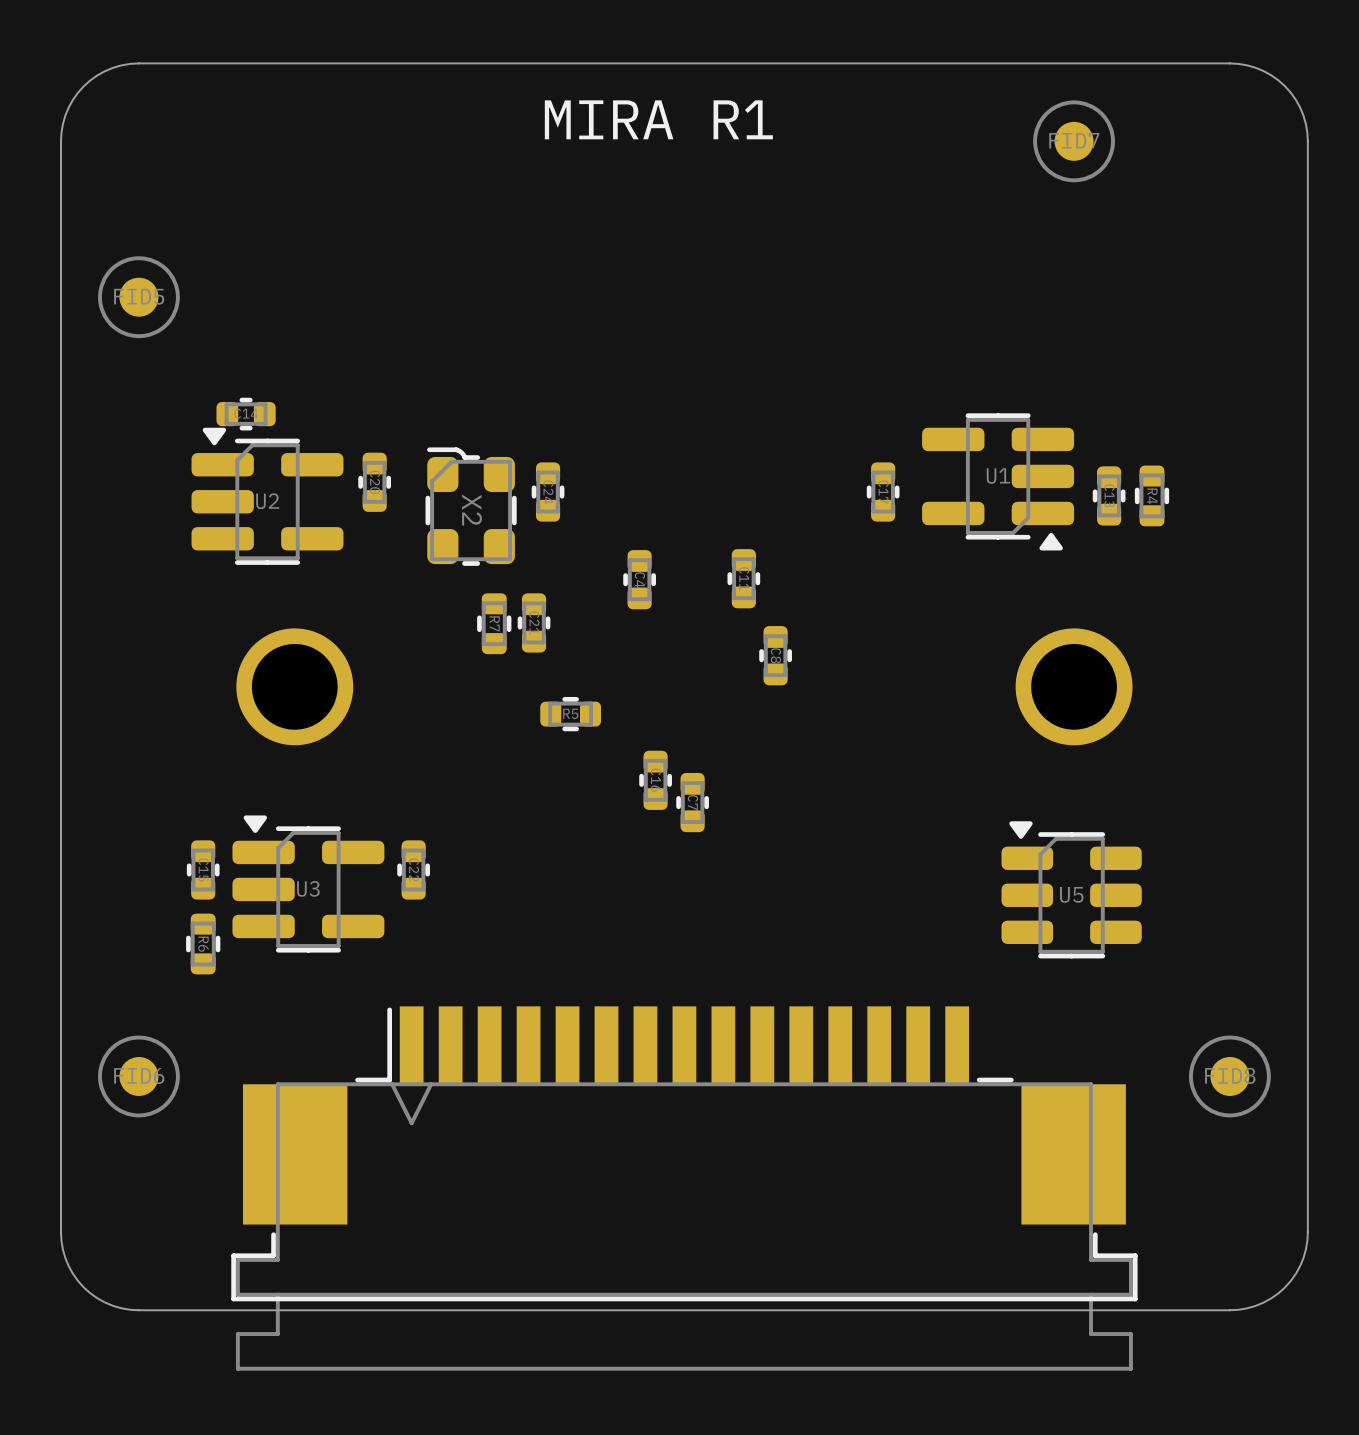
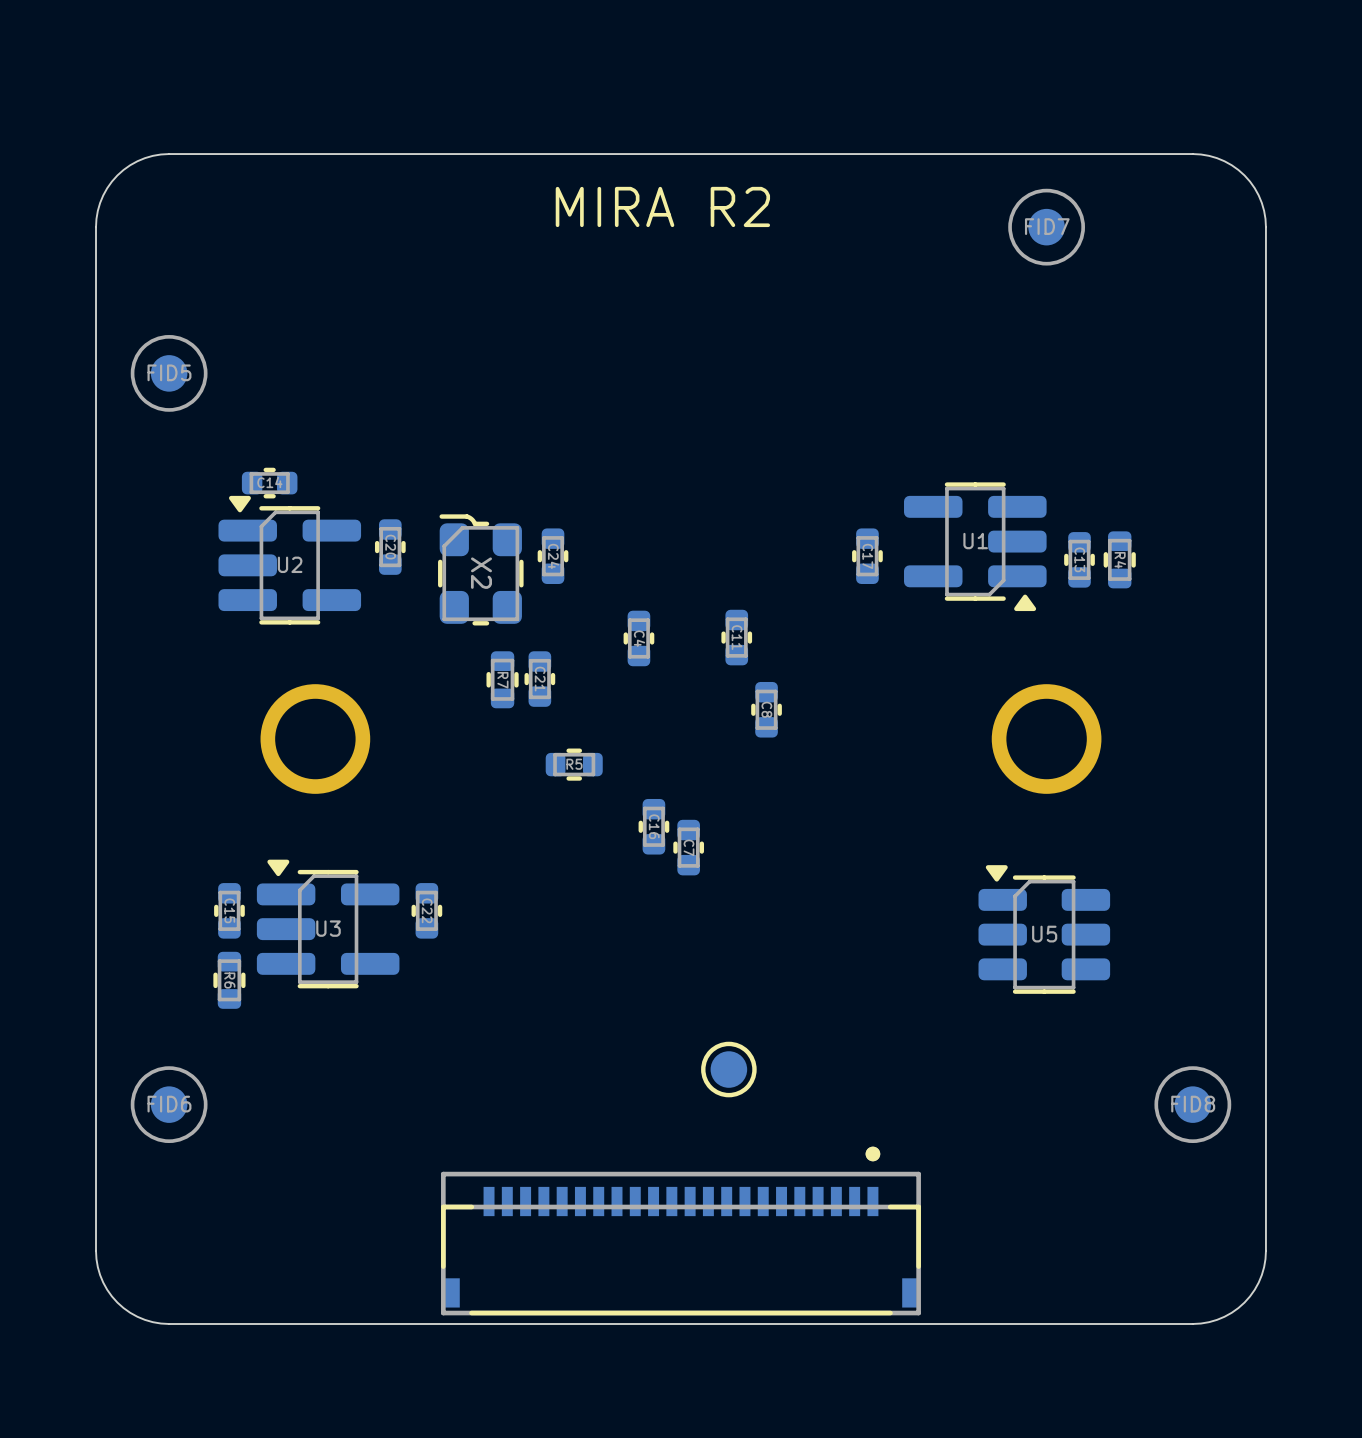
text: MIRA R1 (658, 119) -> MIRA R2 (662, 206)
part footprint: [231, 1006, 1138, 1371] -> [441, 1146, 921, 1316]
part: none -> (728, 1069)

